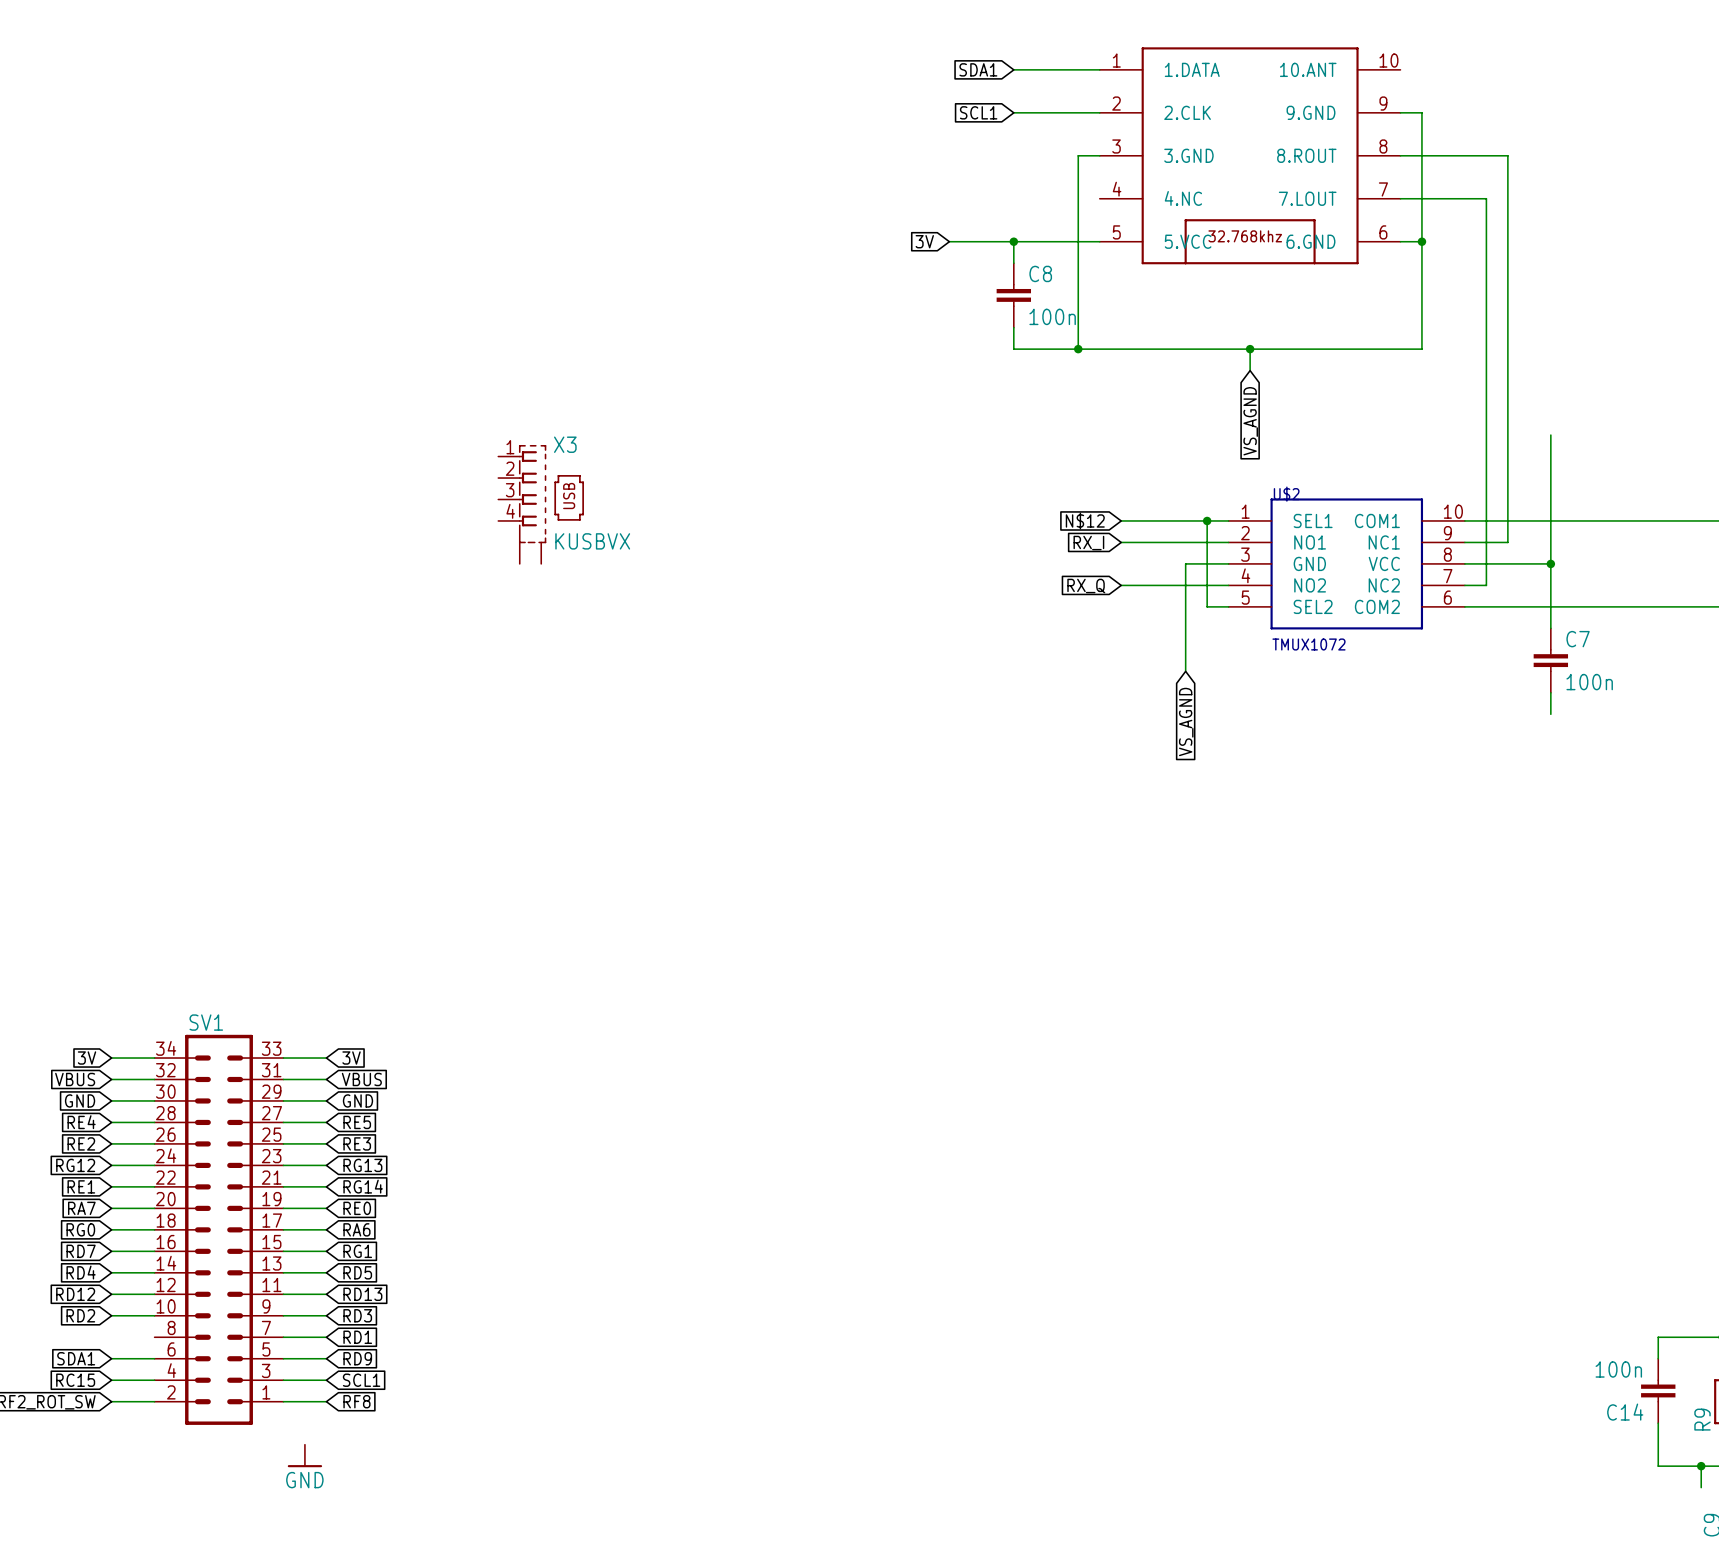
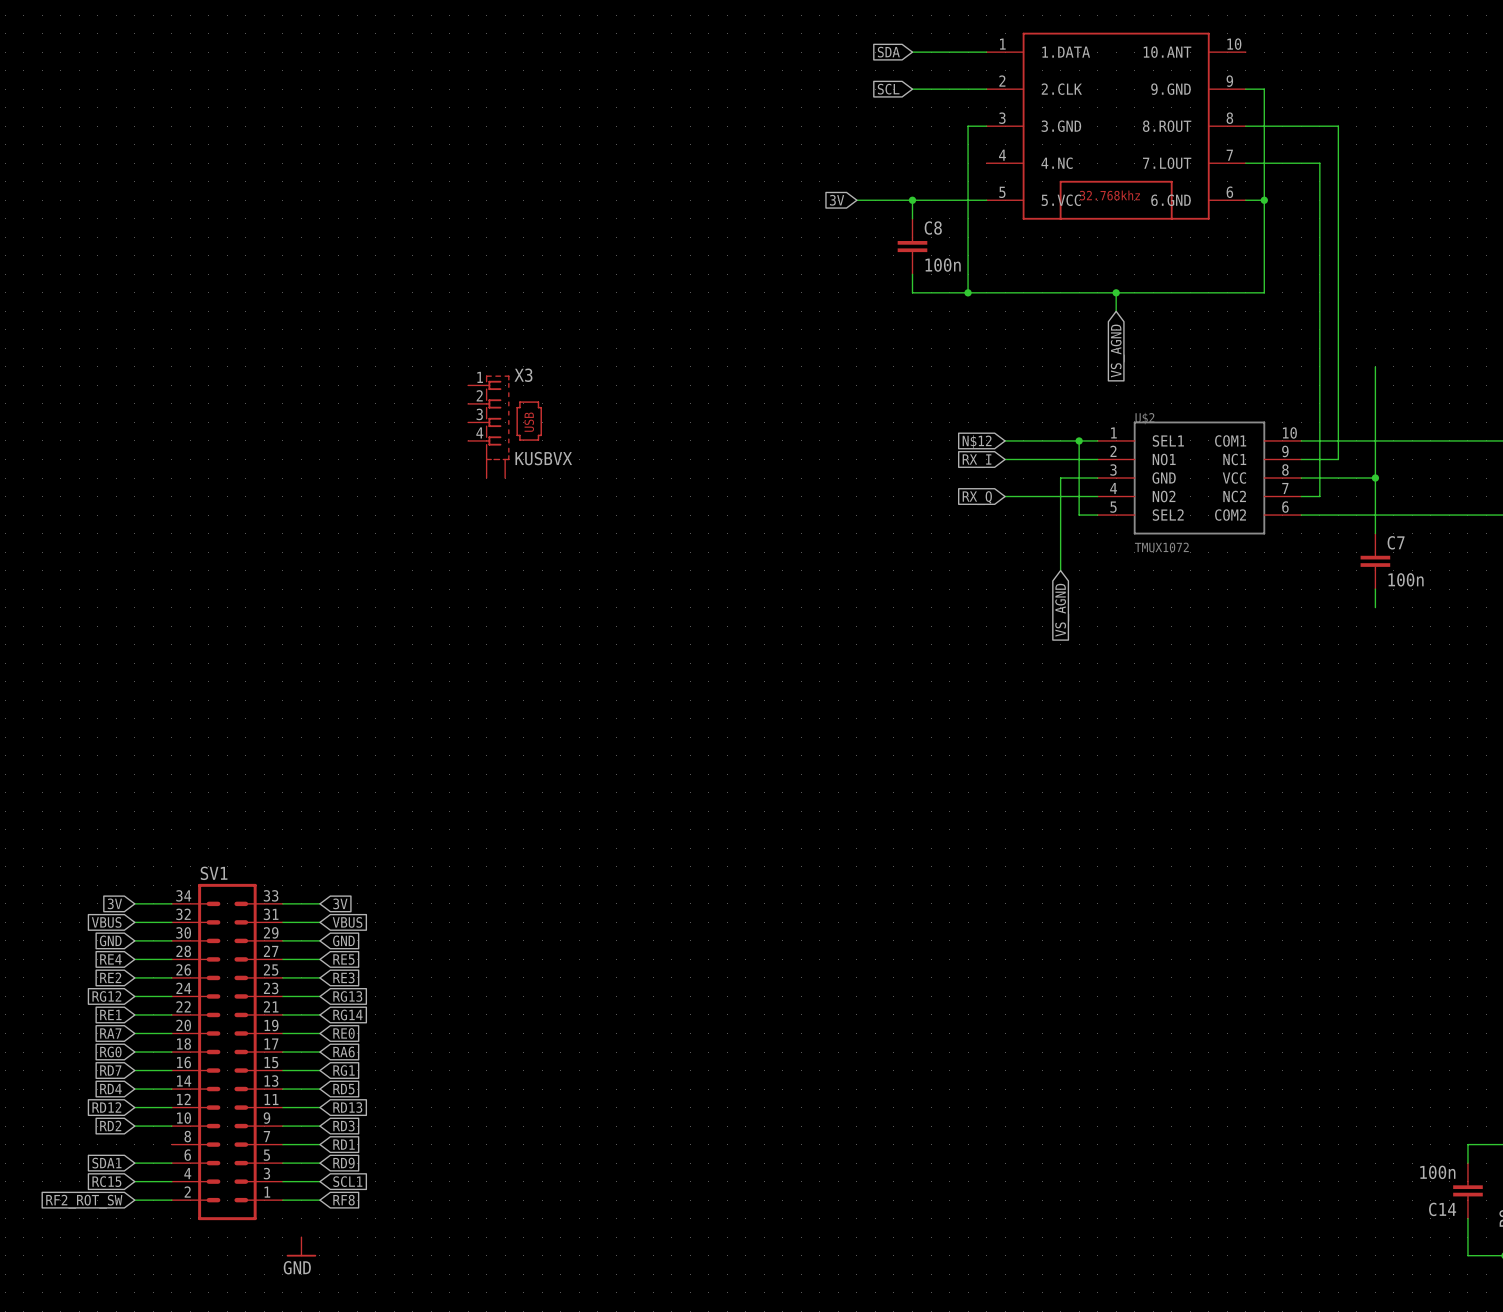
global label: SDA1 (978, 69) -> SDA (888, 52)
global label: SCL1 (978, 112) -> SCL (888, 89)

